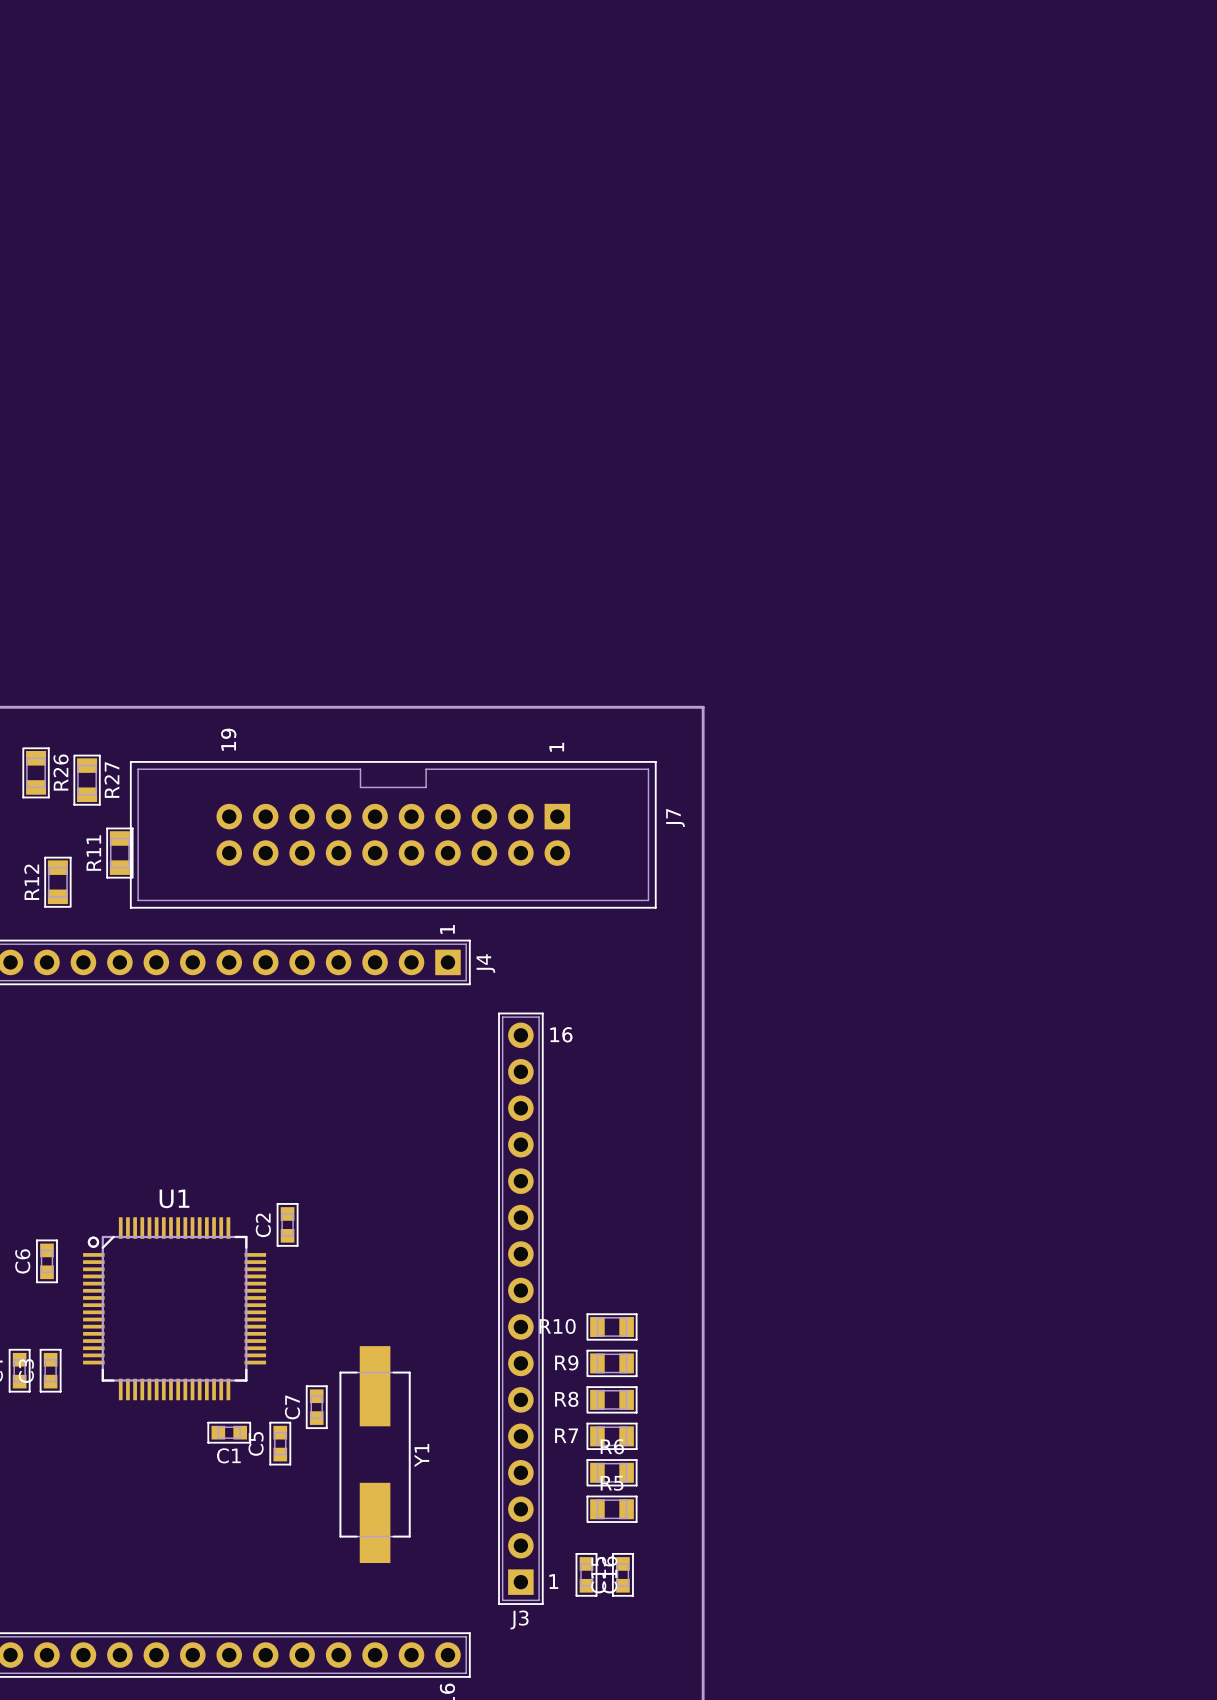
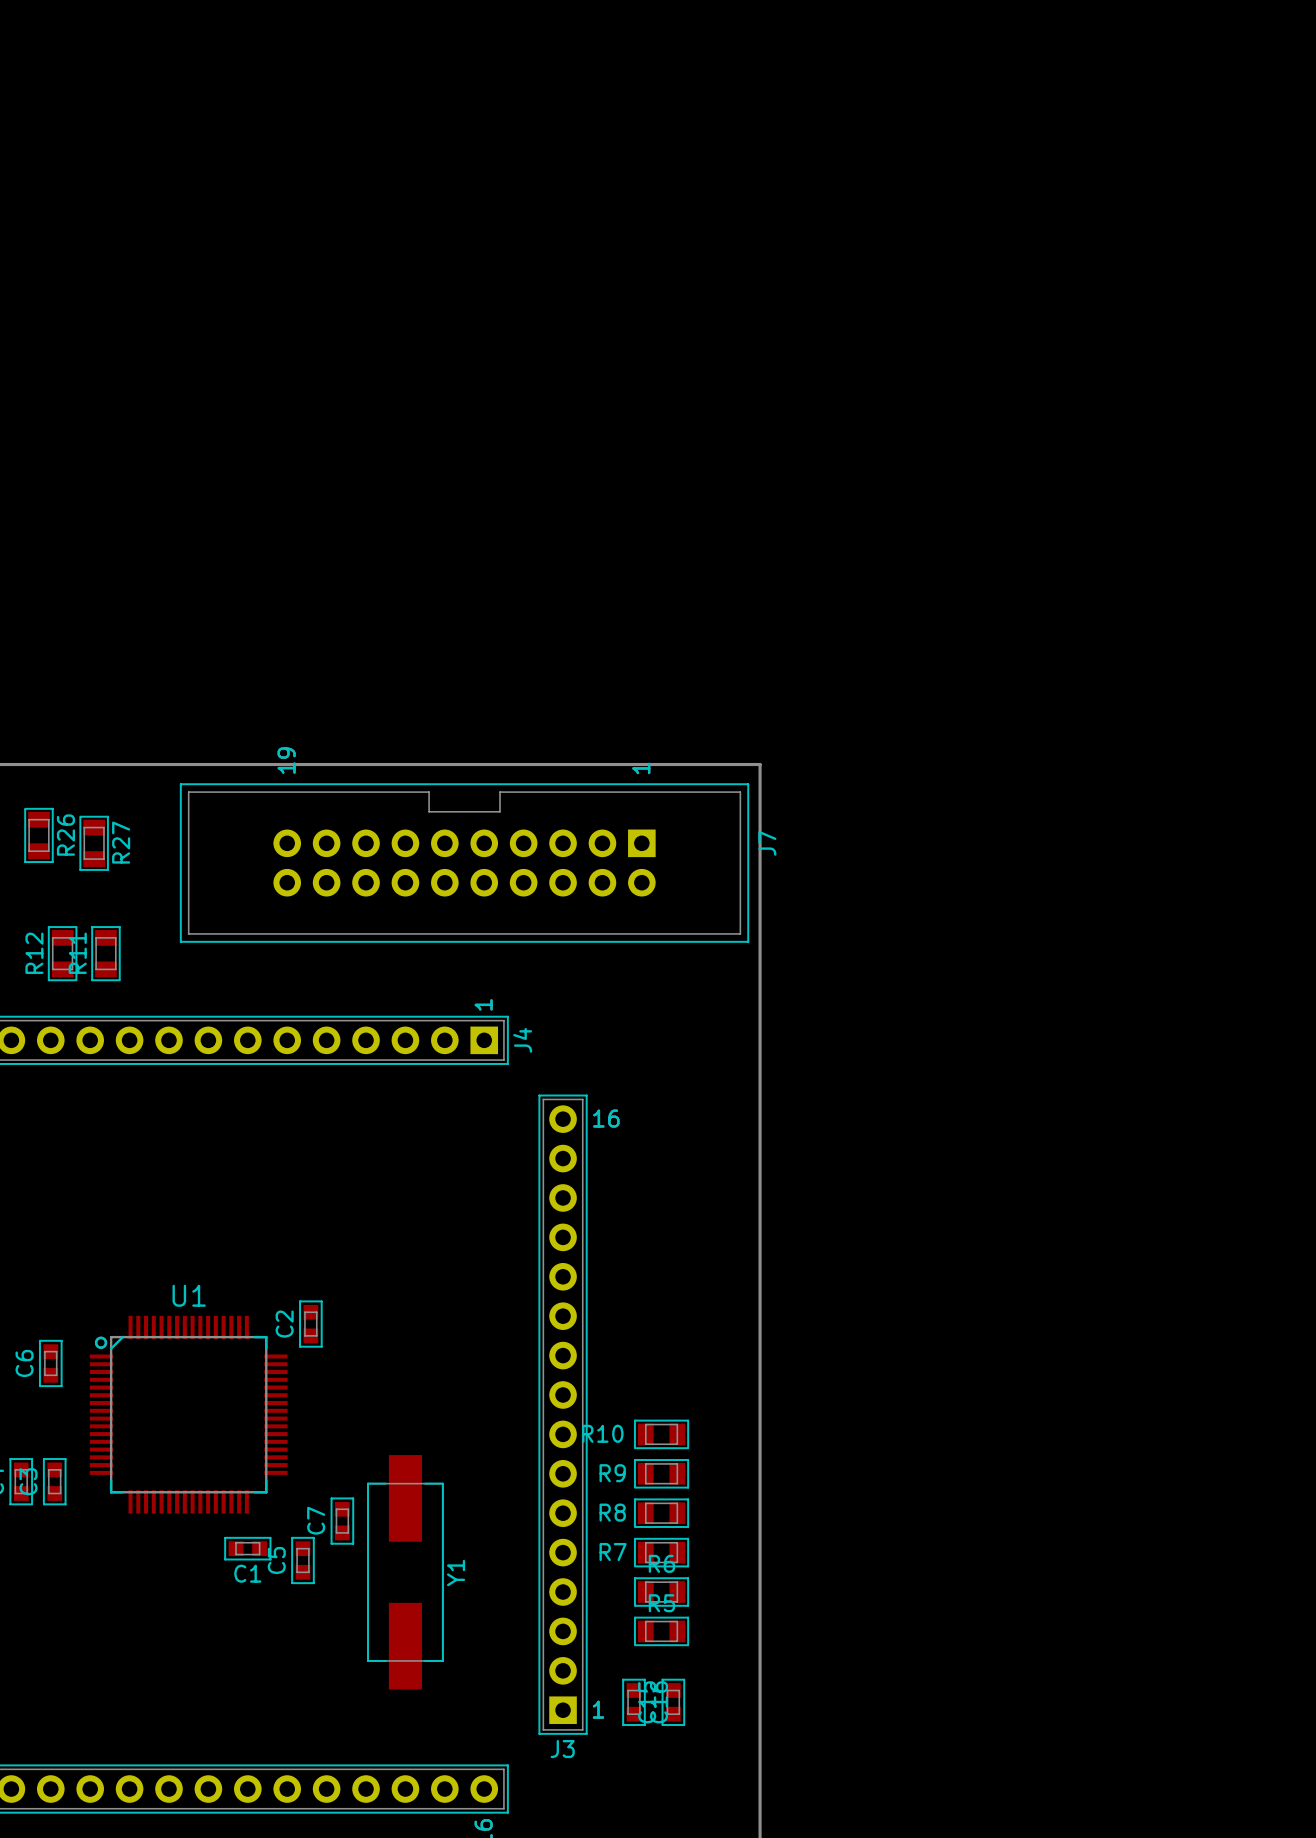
J7 position: (393, 834) -> (464, 863)
R11 position: (119, 853) -> (105, 953)

